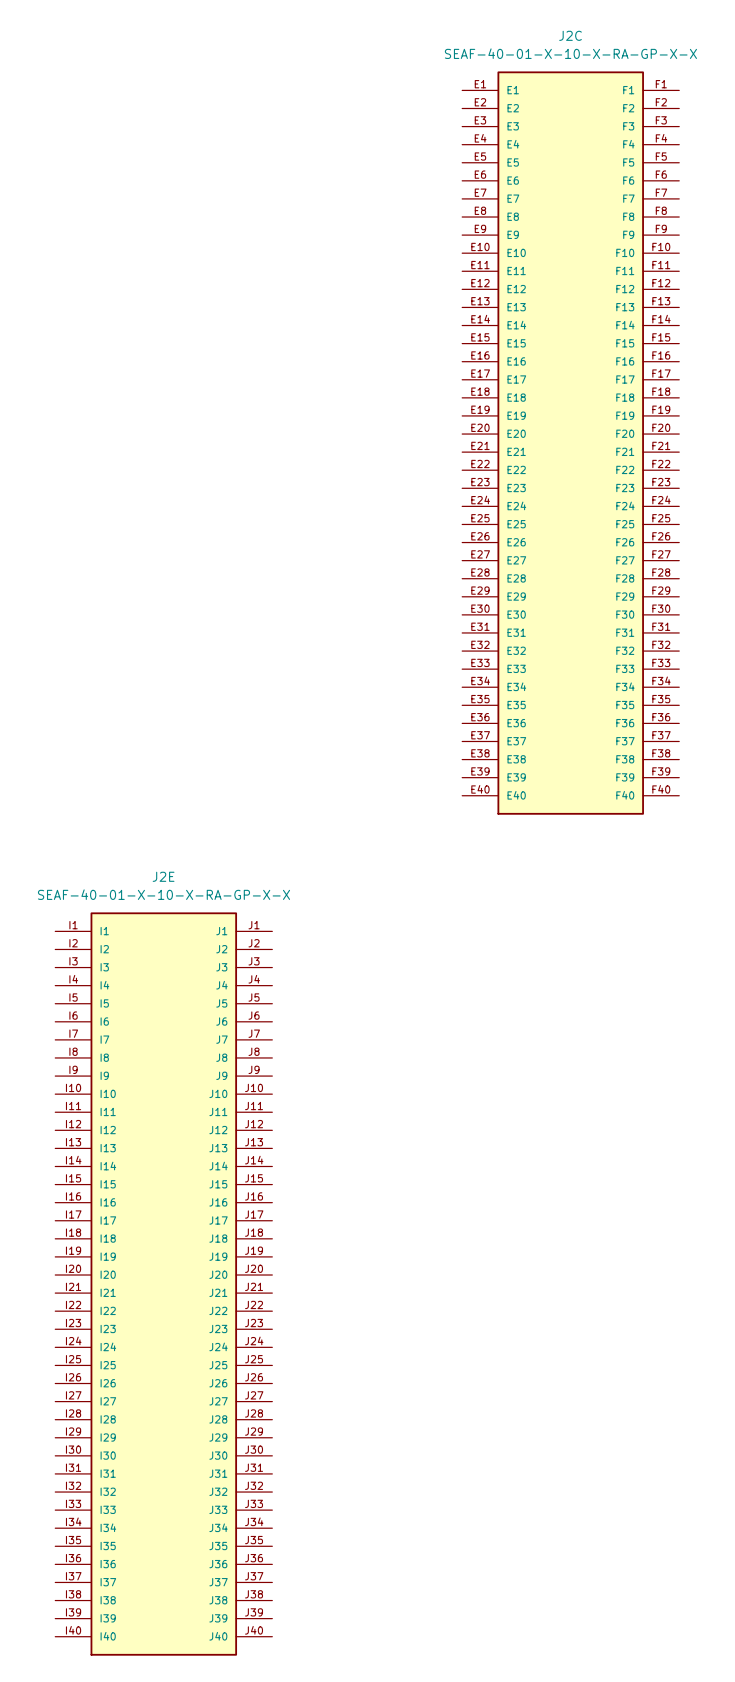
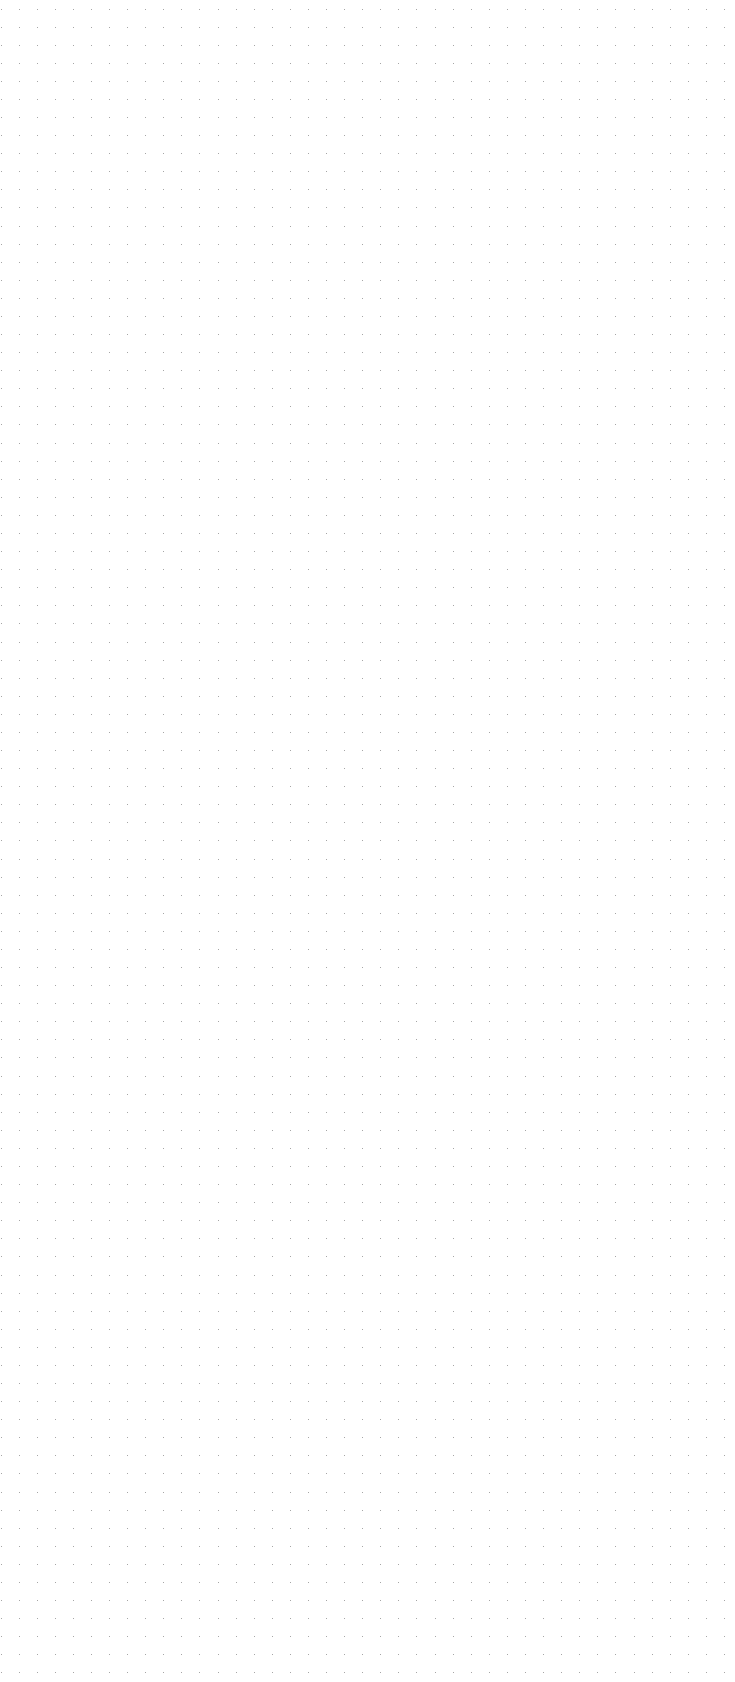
J2C: SEAF-40-01-X-10-X-RA-GP-X-X (570, 443) -> none
J2E: SEAF-40-01-X-10-X-RA-GP-X-X (163, 1284) -> none

